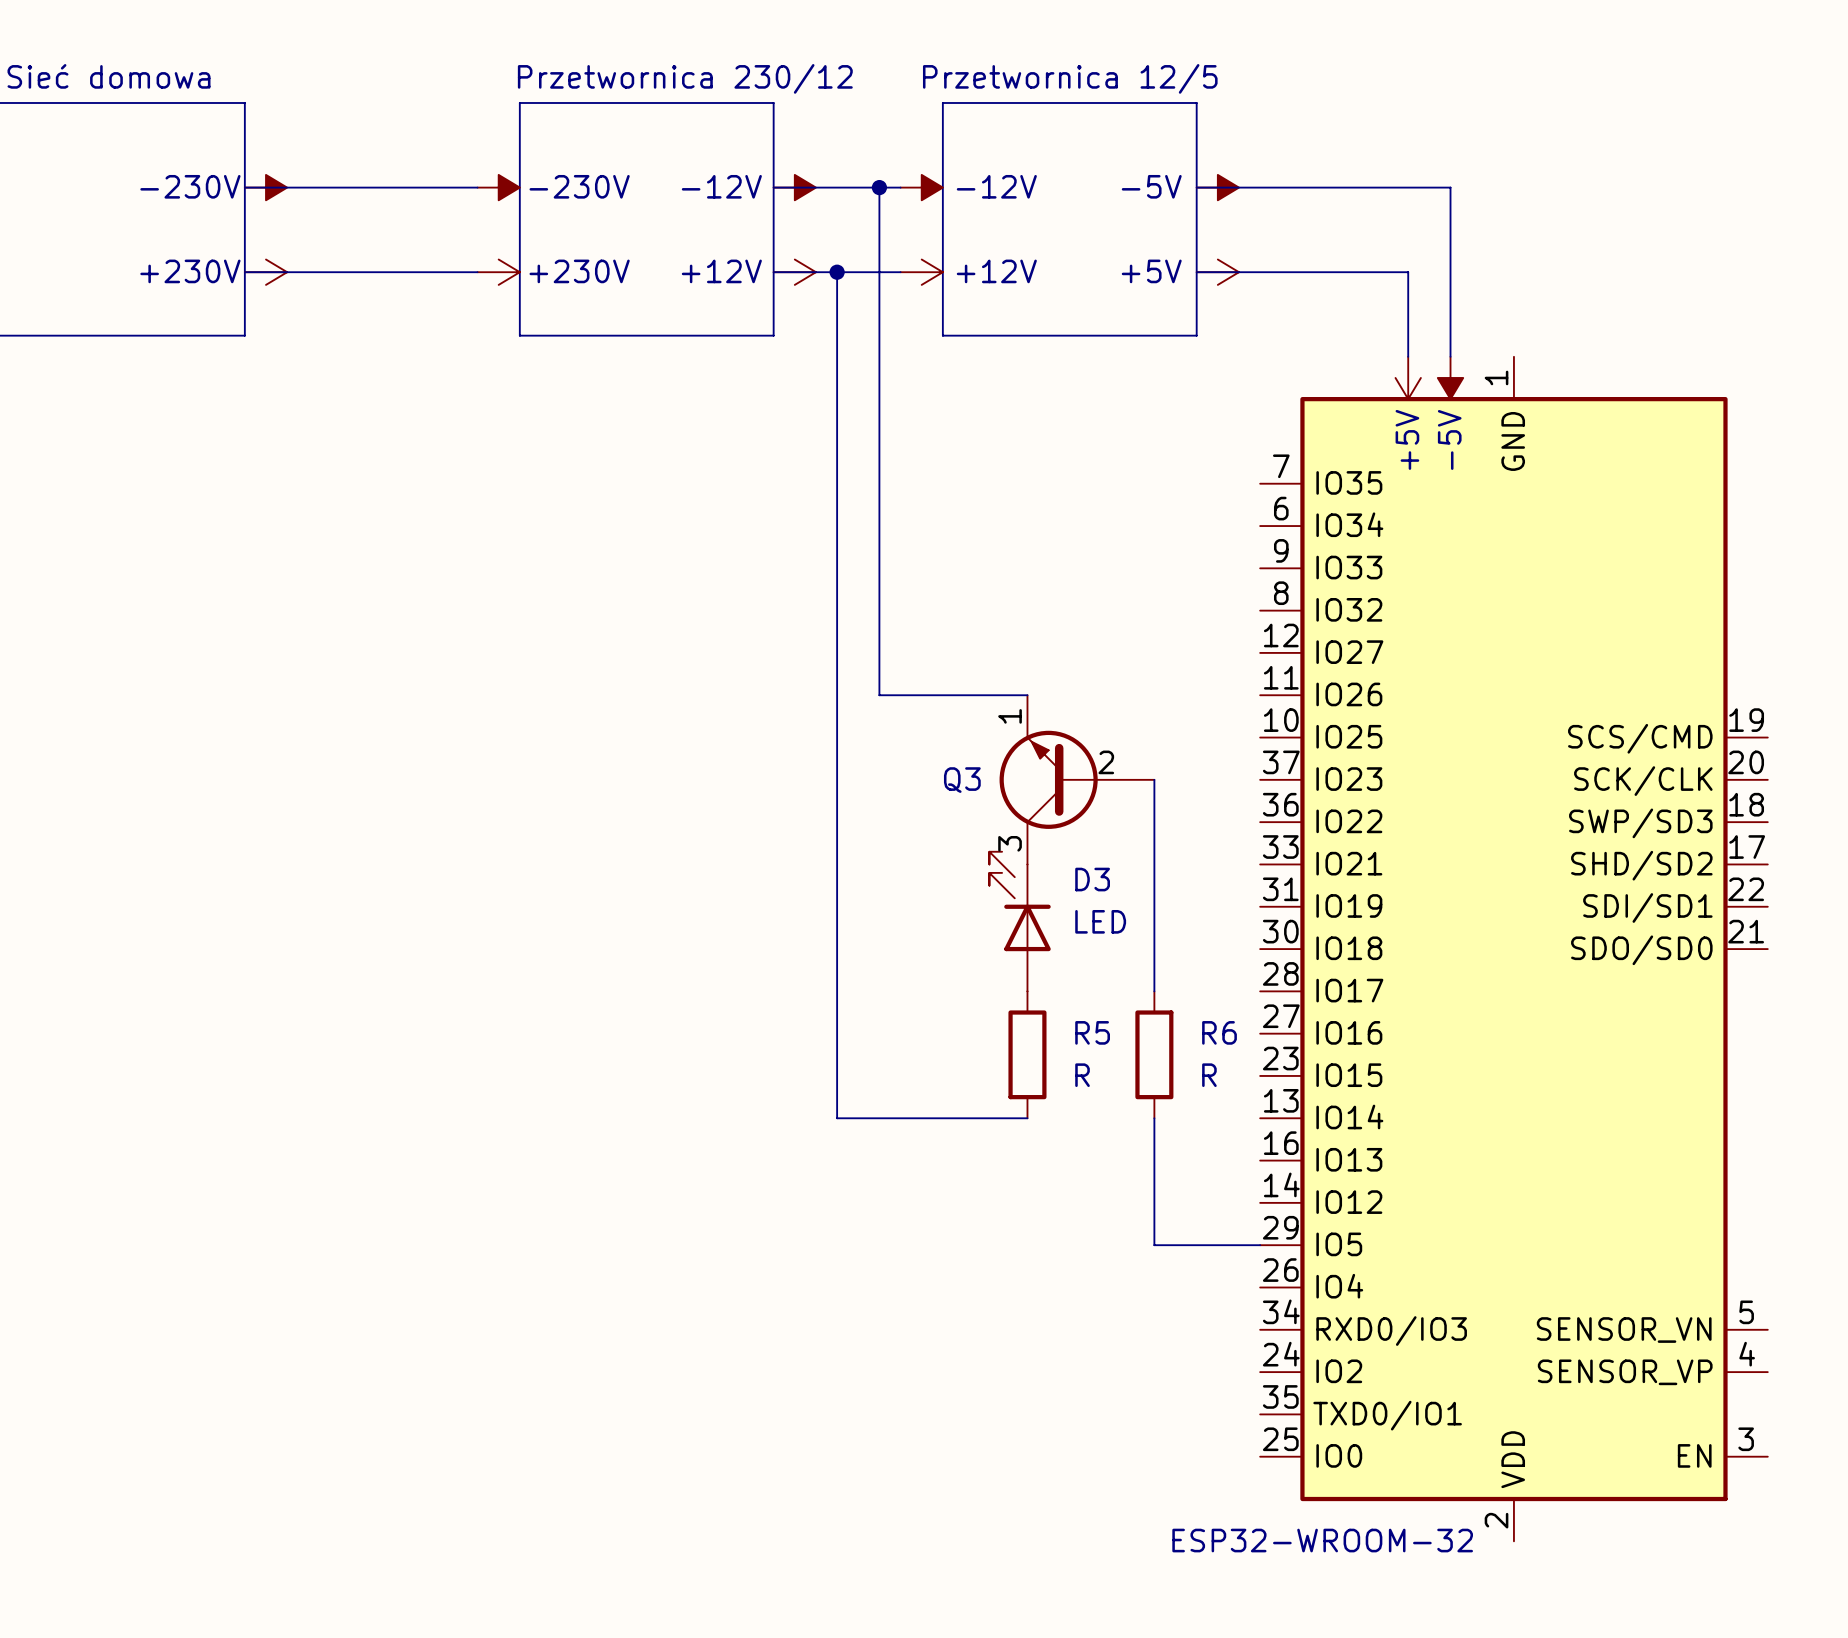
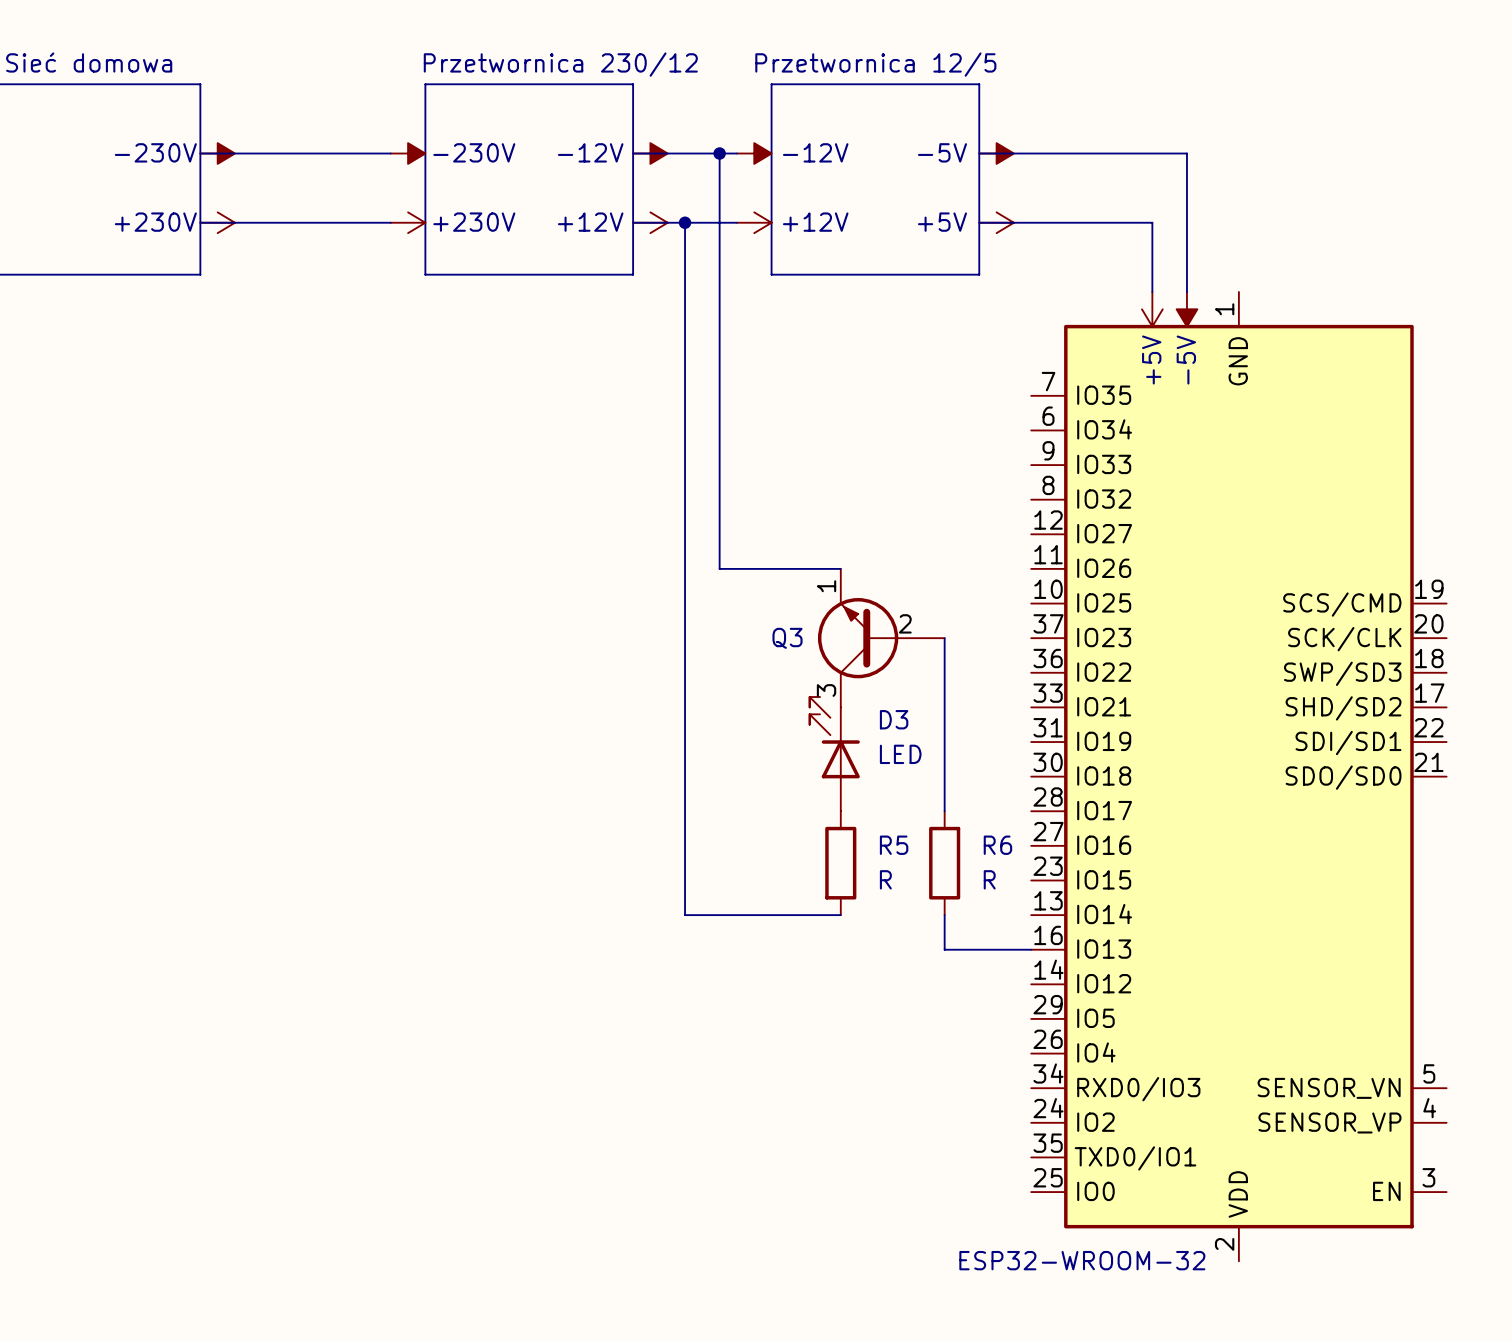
wire: (1154, 1160) (1154, 1245) (1260, 1245) -> (944, 949) (1031, 949)

